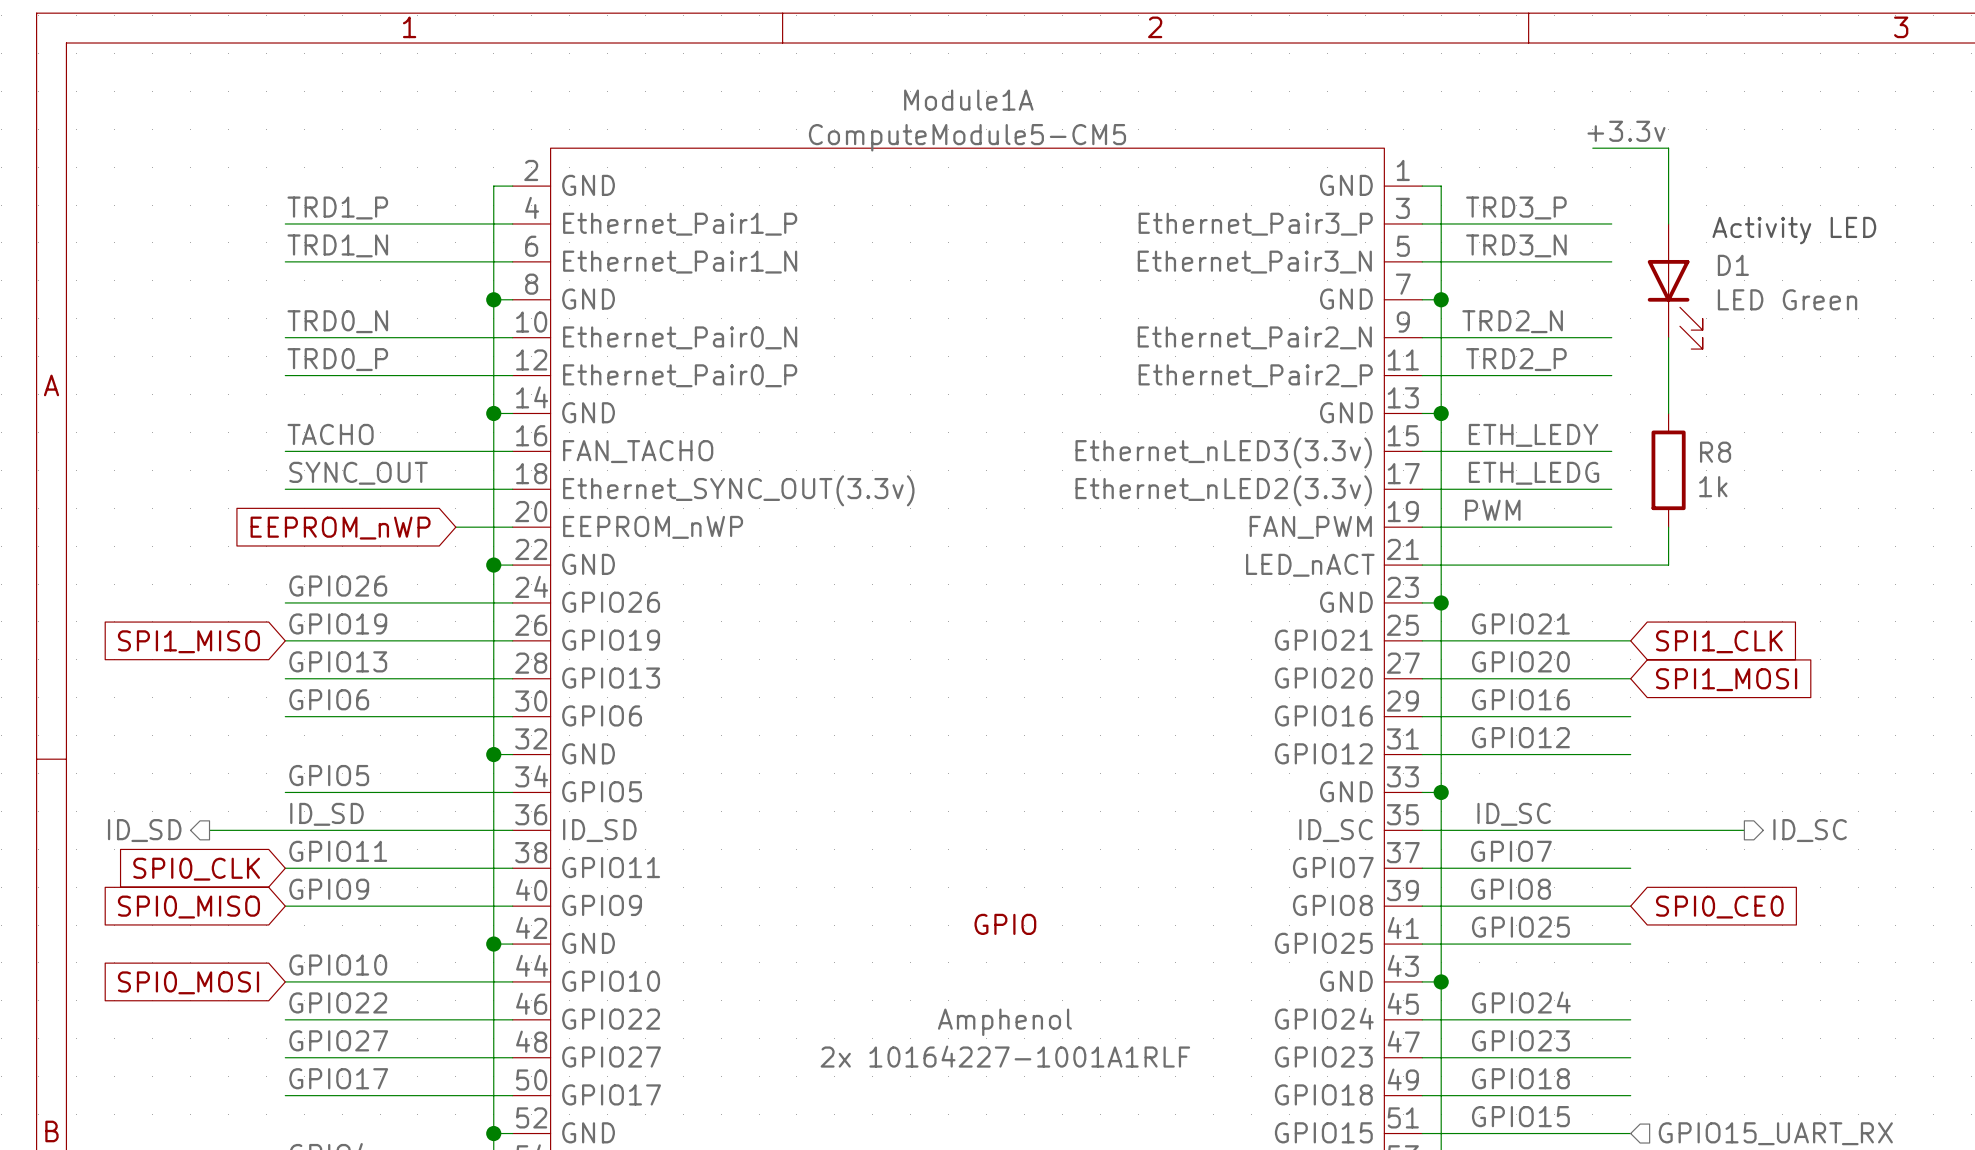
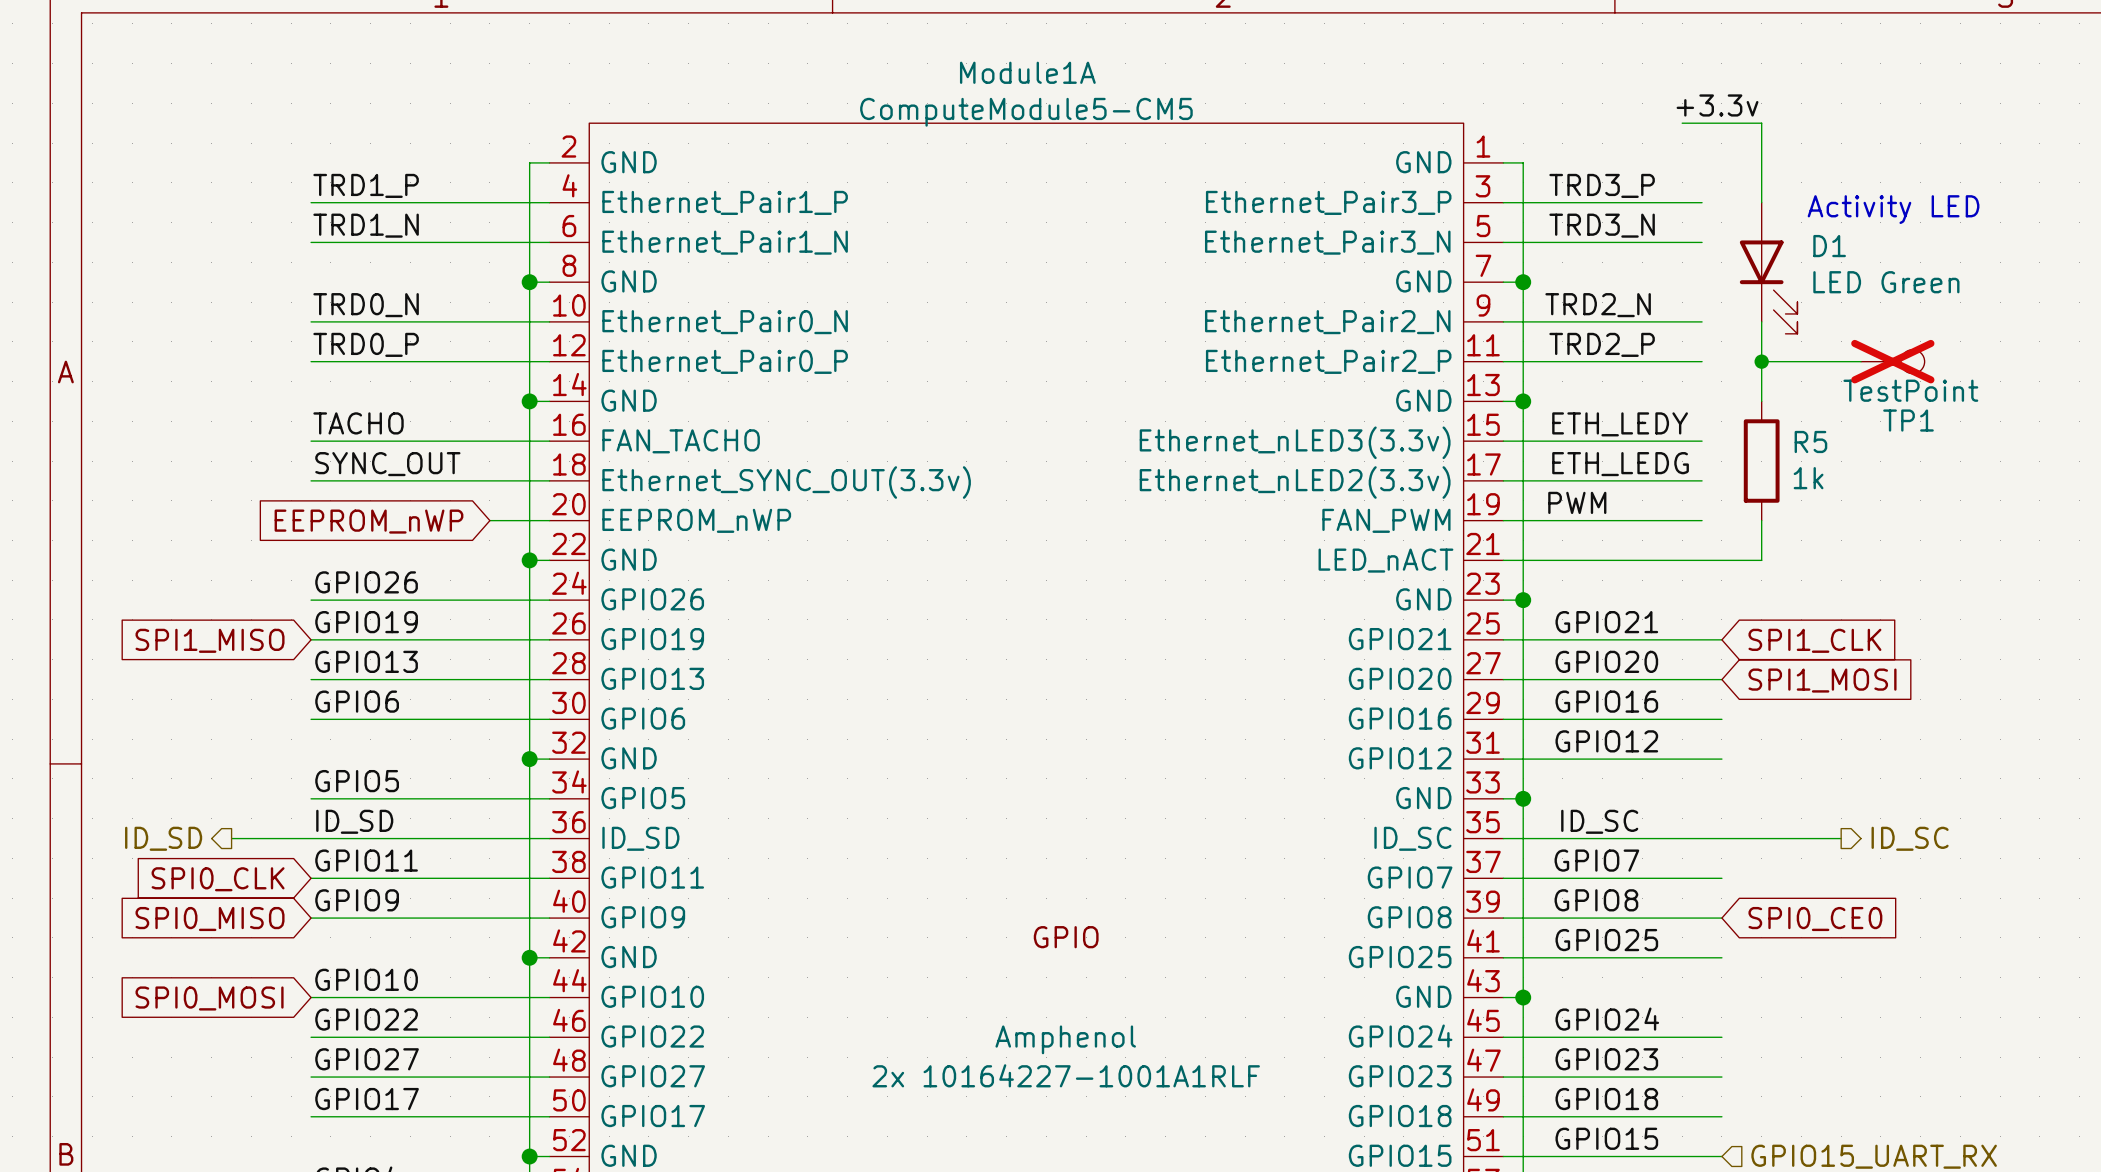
wire: none -> (1761, 361) (1861, 361)
junction: none -> (1761, 361)
TP1: none -> TestPoint (1892, 361)
R8 name: R8 (1715, 452) -> R5 (1810, 441)

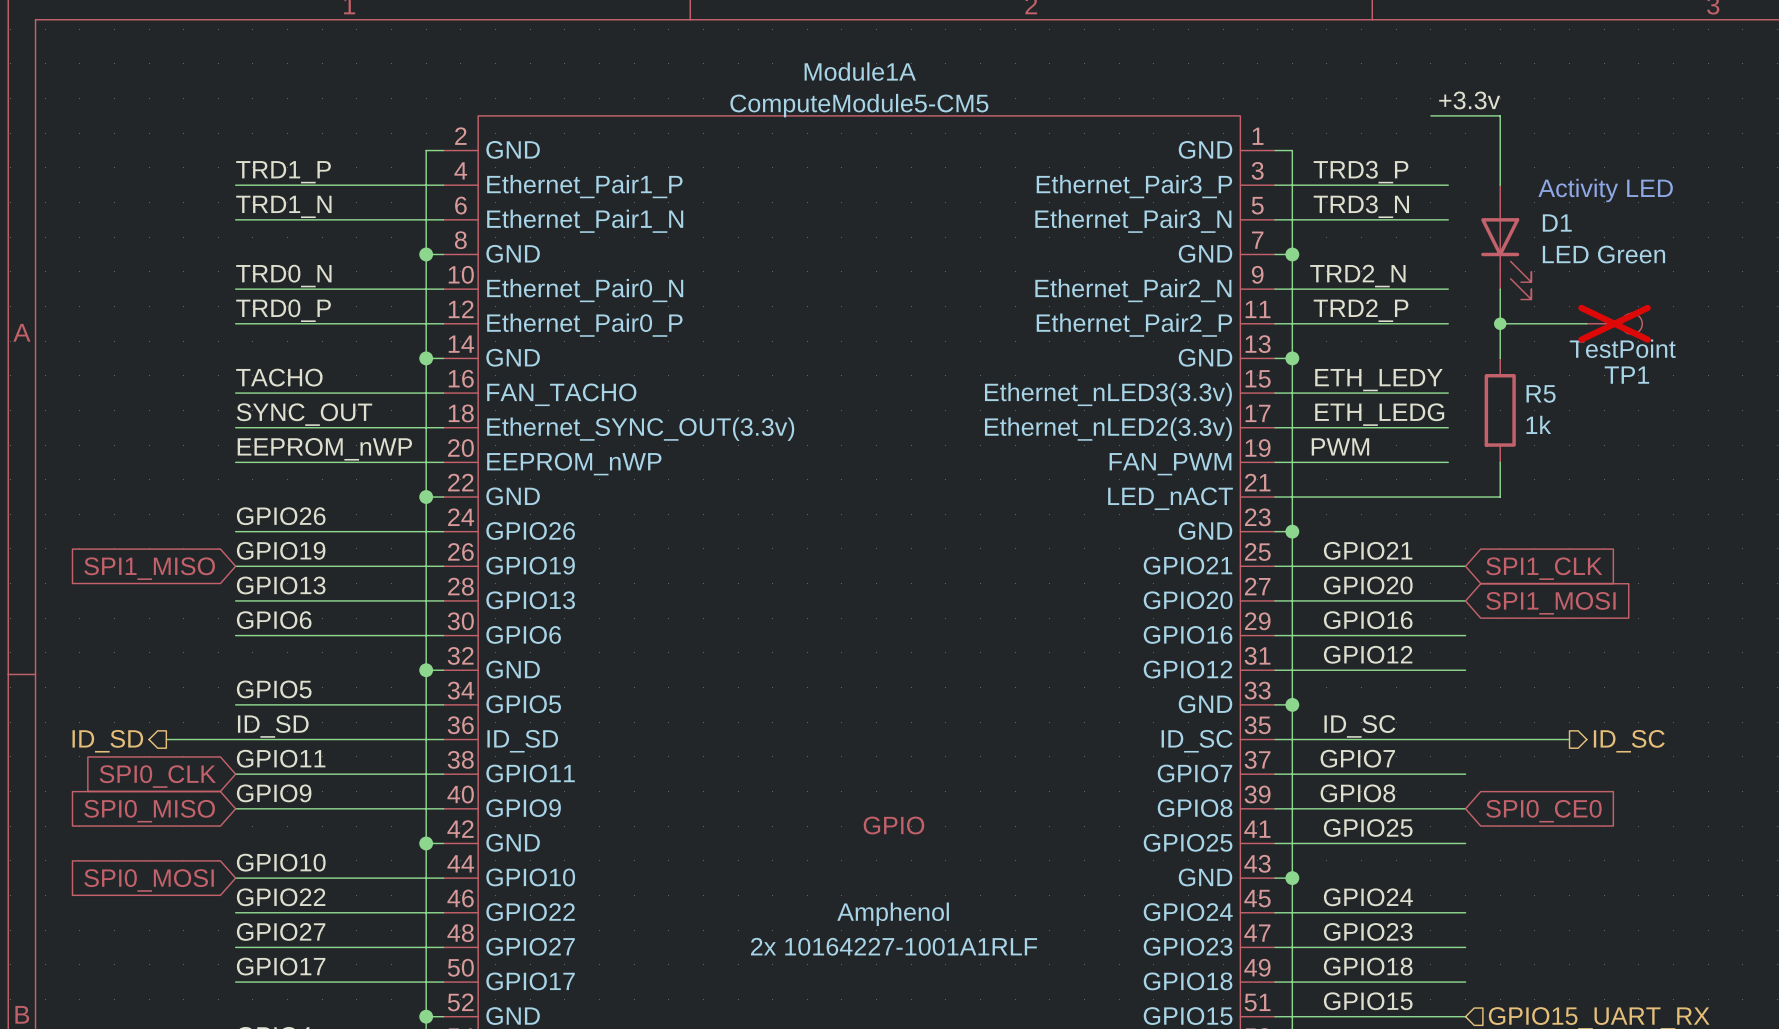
label: none -> EEPROM_nWP (324, 449)
wire: none -> (235, 462) (391, 462)
global label: EEPROM_nWP (368, 521) -> none

